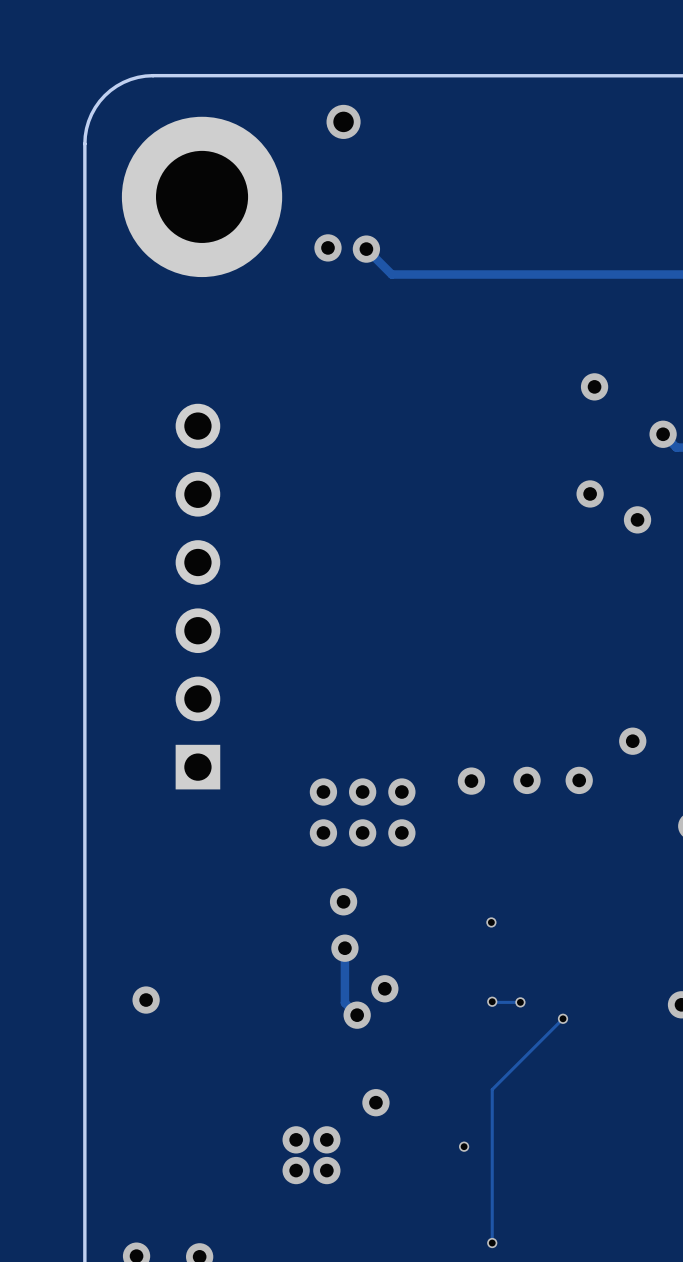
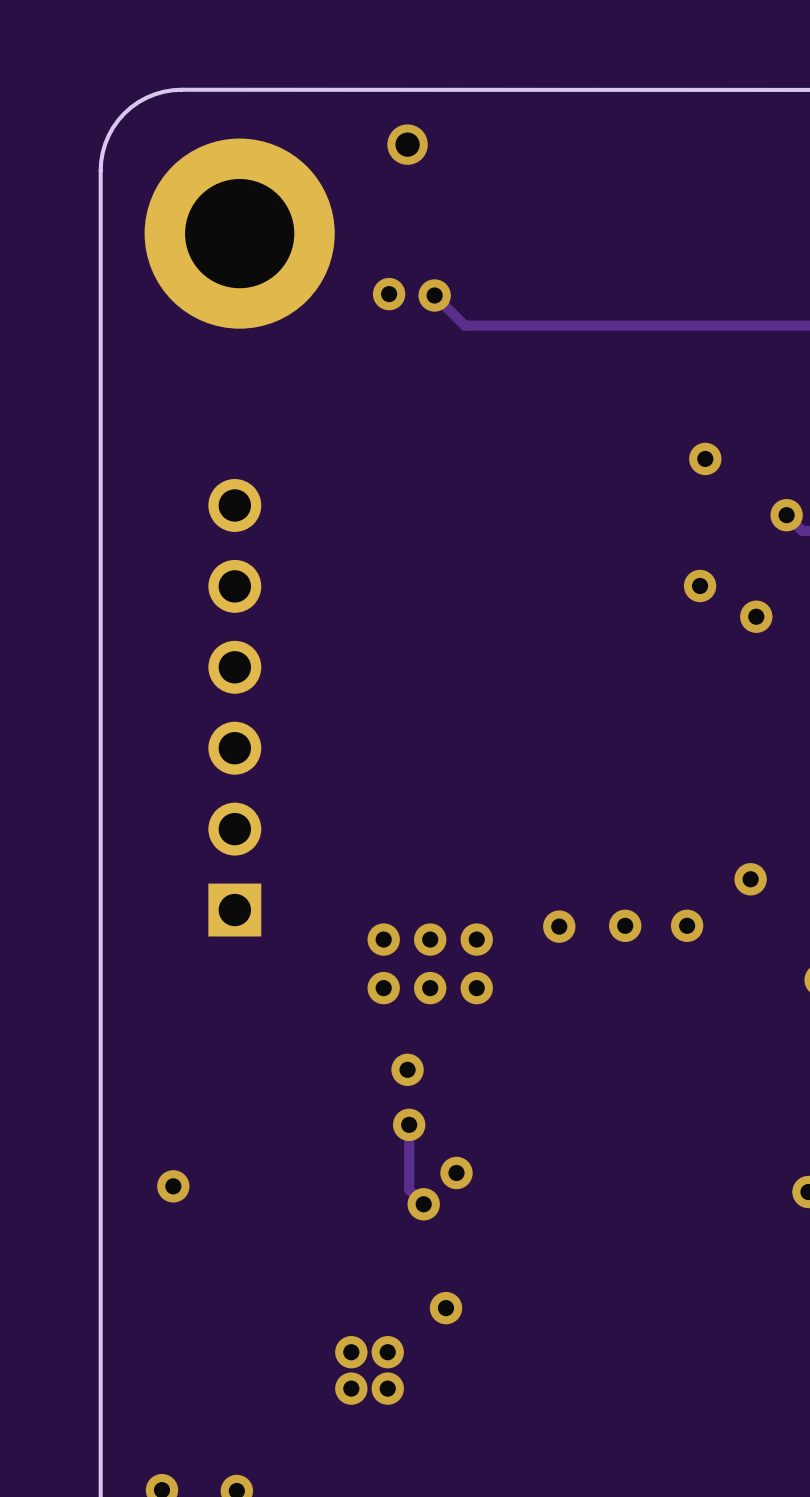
via: (491, 922) -> none
track: (492, 1001) (520, 1002) -> none
via: (492, 1001) -> none
via: (520, 1002) -> none
track: (563, 1018) (492, 1089) (492, 1243) -> none
via: (563, 1018) -> none
via: (464, 1146) -> none
via: (492, 1243) -> none

